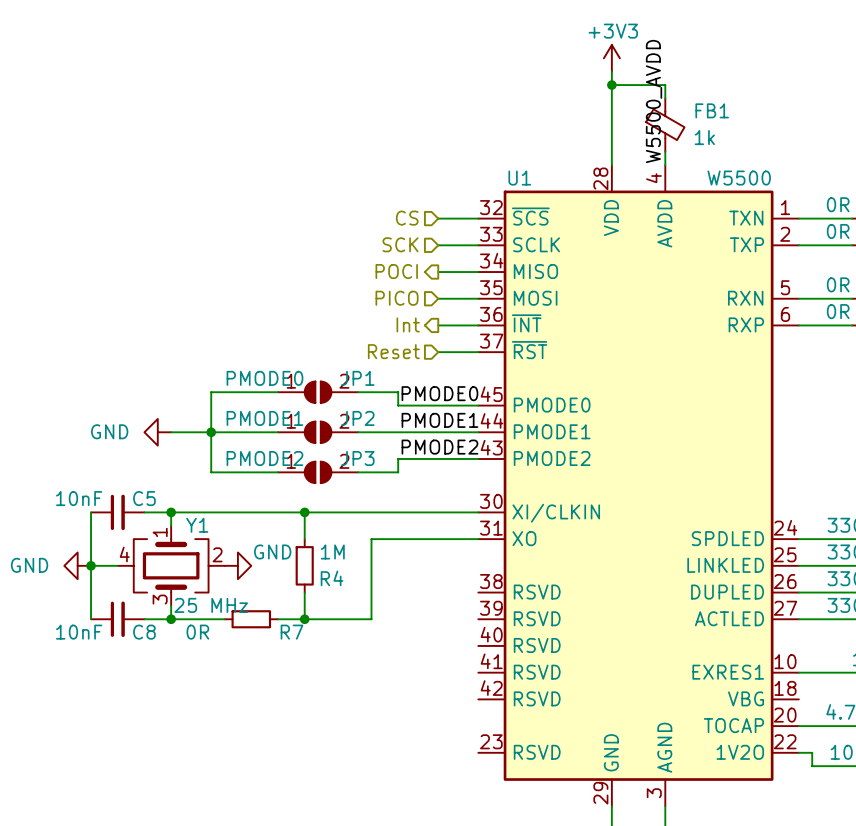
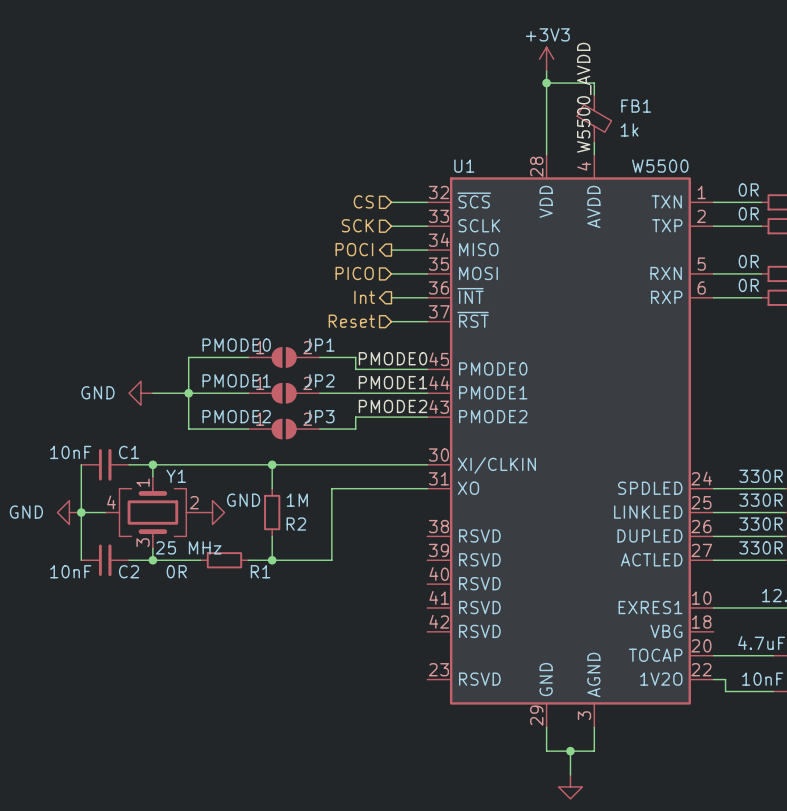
C5 name: C5 (144, 498) -> C1 (129, 452)
R4 name: R4 (332, 578) -> R2 (296, 524)
C8 name: C8 (144, 632) -> C2 (129, 571)
R7 name: R7 (291, 632) -> R1 (260, 571)

